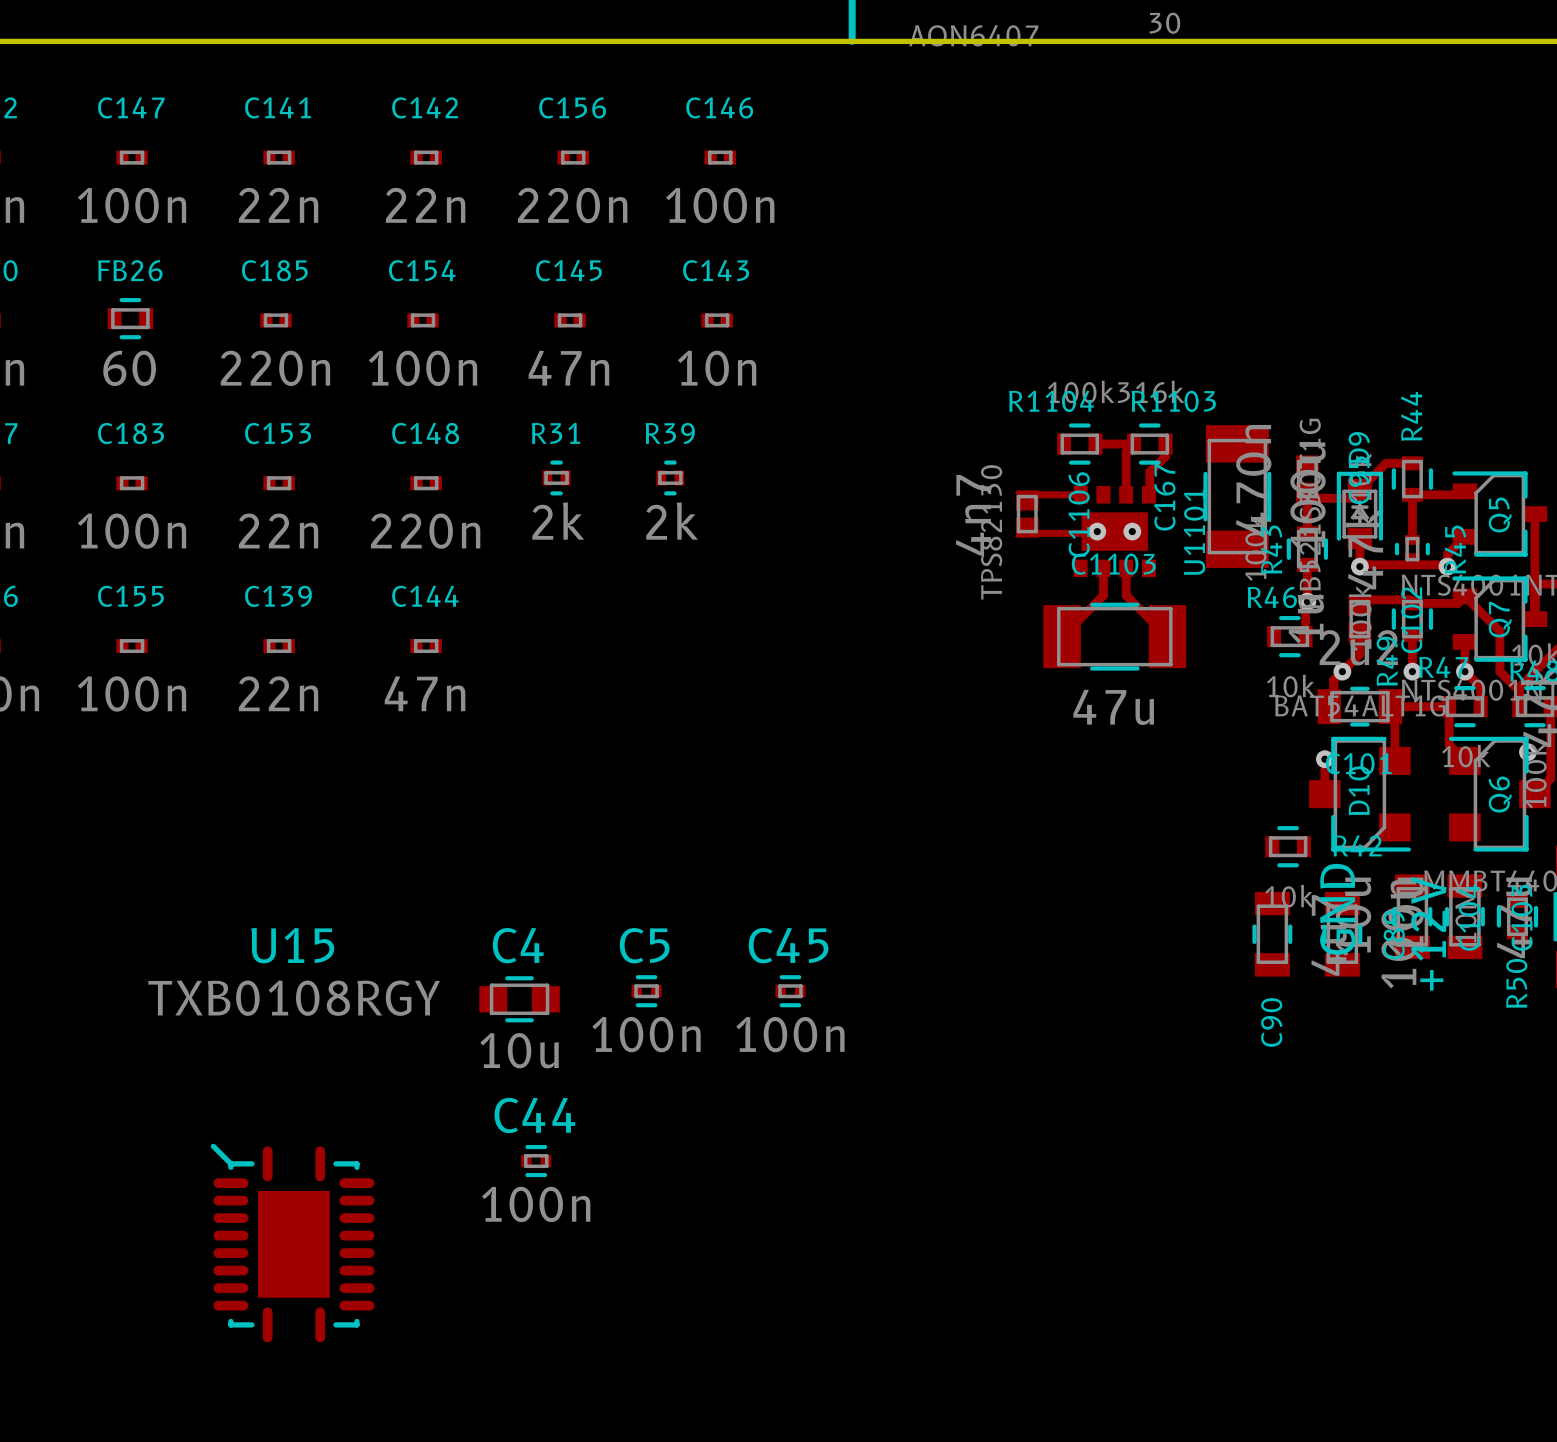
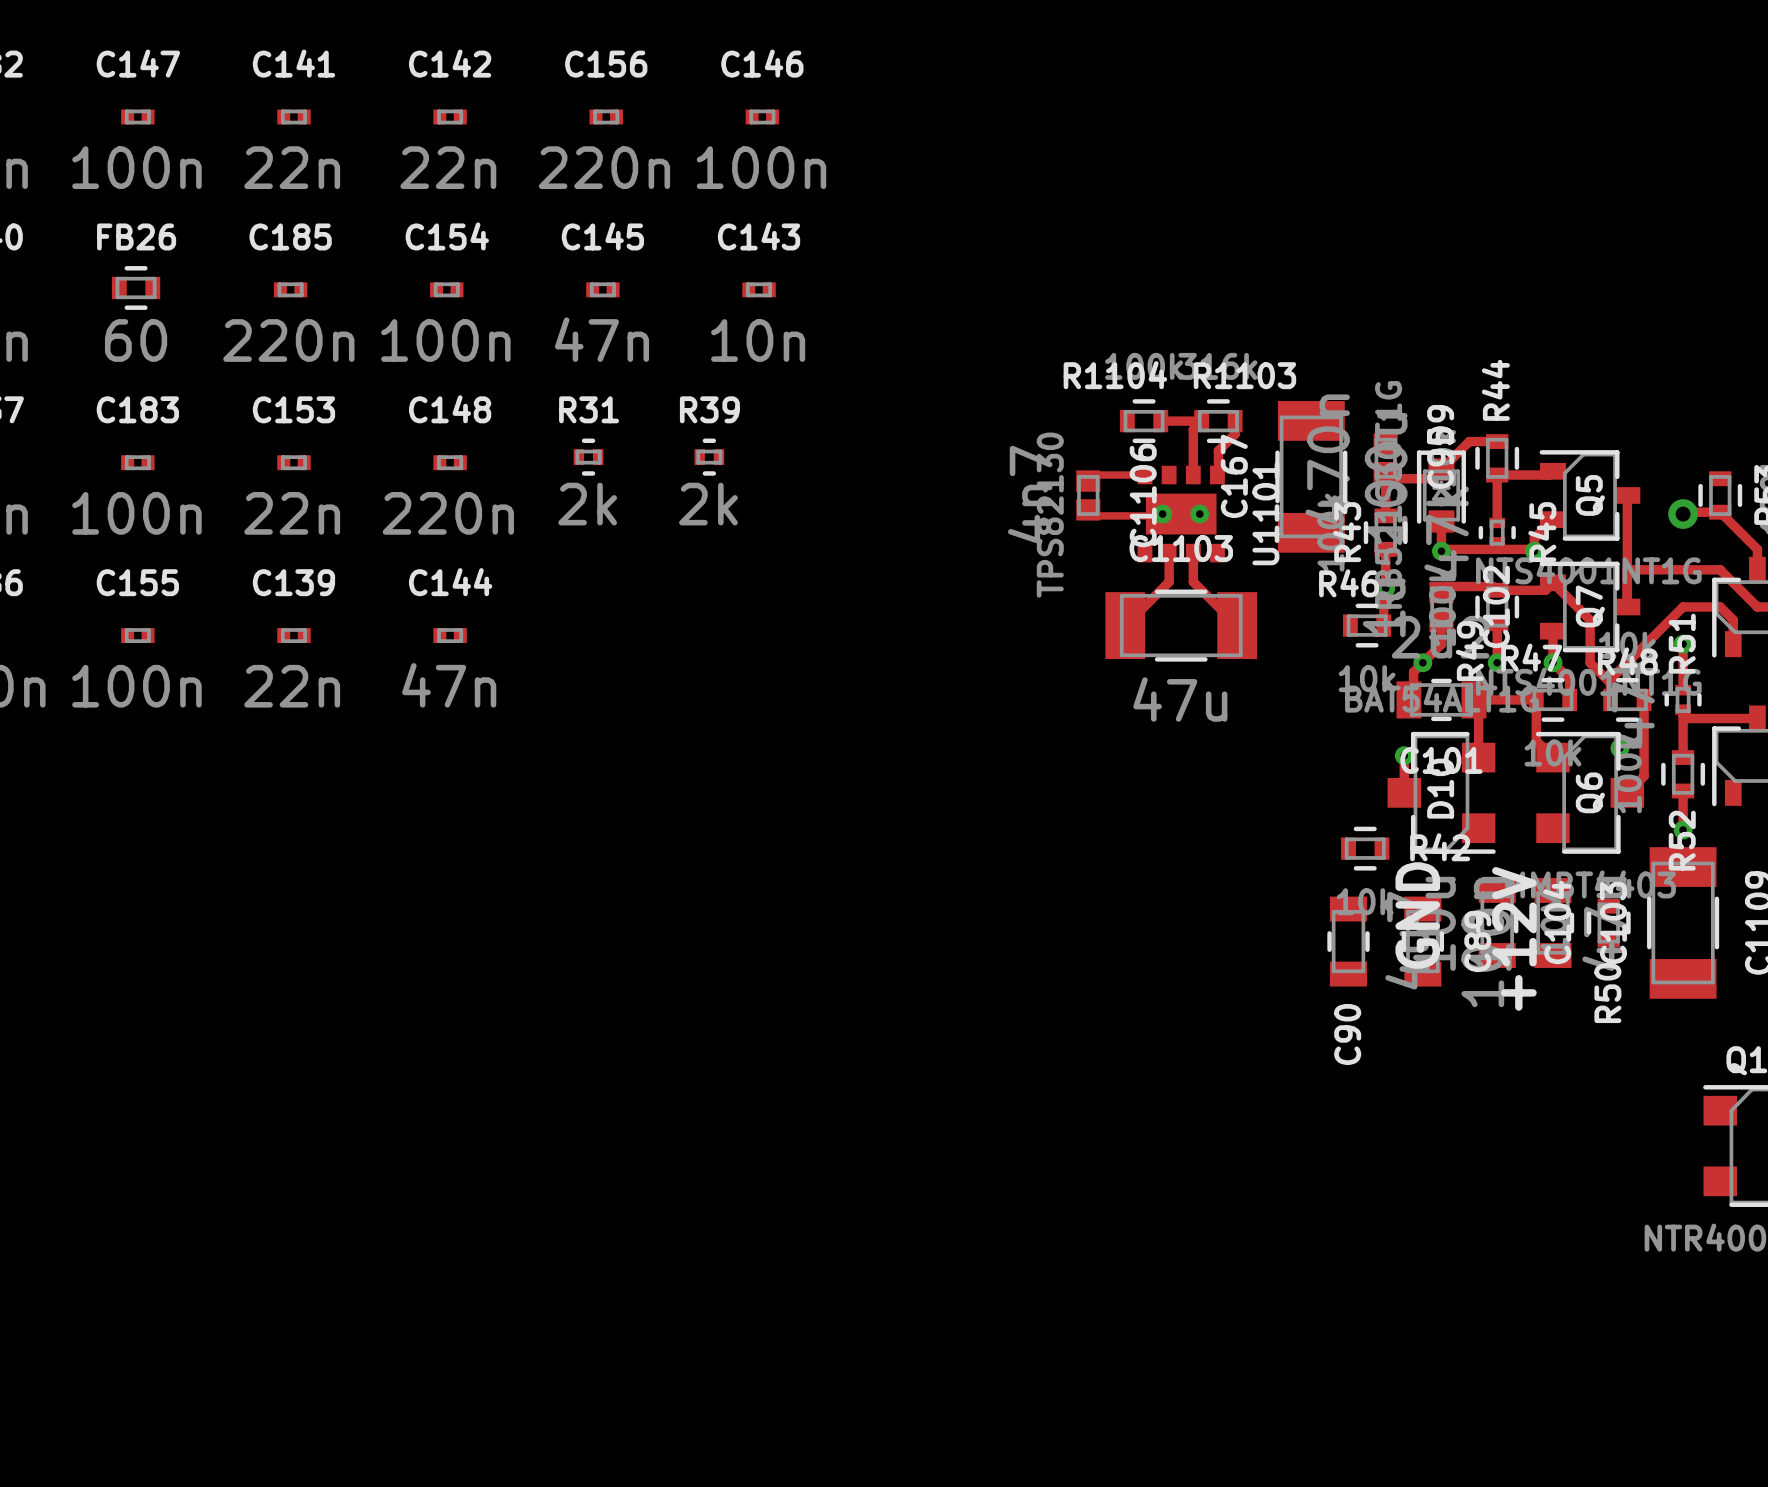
C5: 100n (646, 991) -> none
C45: 100n (790, 991) -> none
C4: 10u (519, 999) -> none
C44: 100n (536, 1161) -> none
U15: TXB0108RGY (292, 1243) -> none

